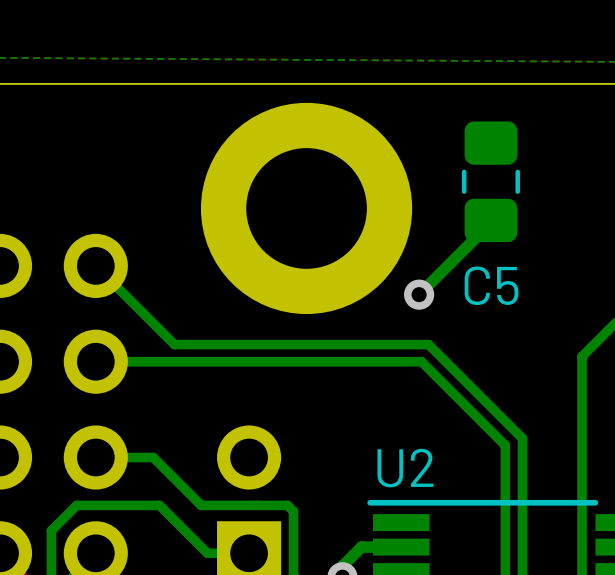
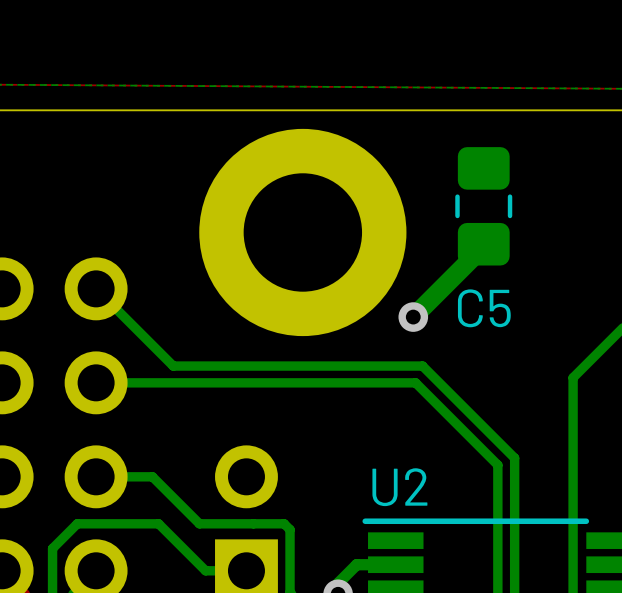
bottom track width: thin (490, 220) (490, 222) (419, 294) -> thick (483, 244) (483, 246) (413, 317)

